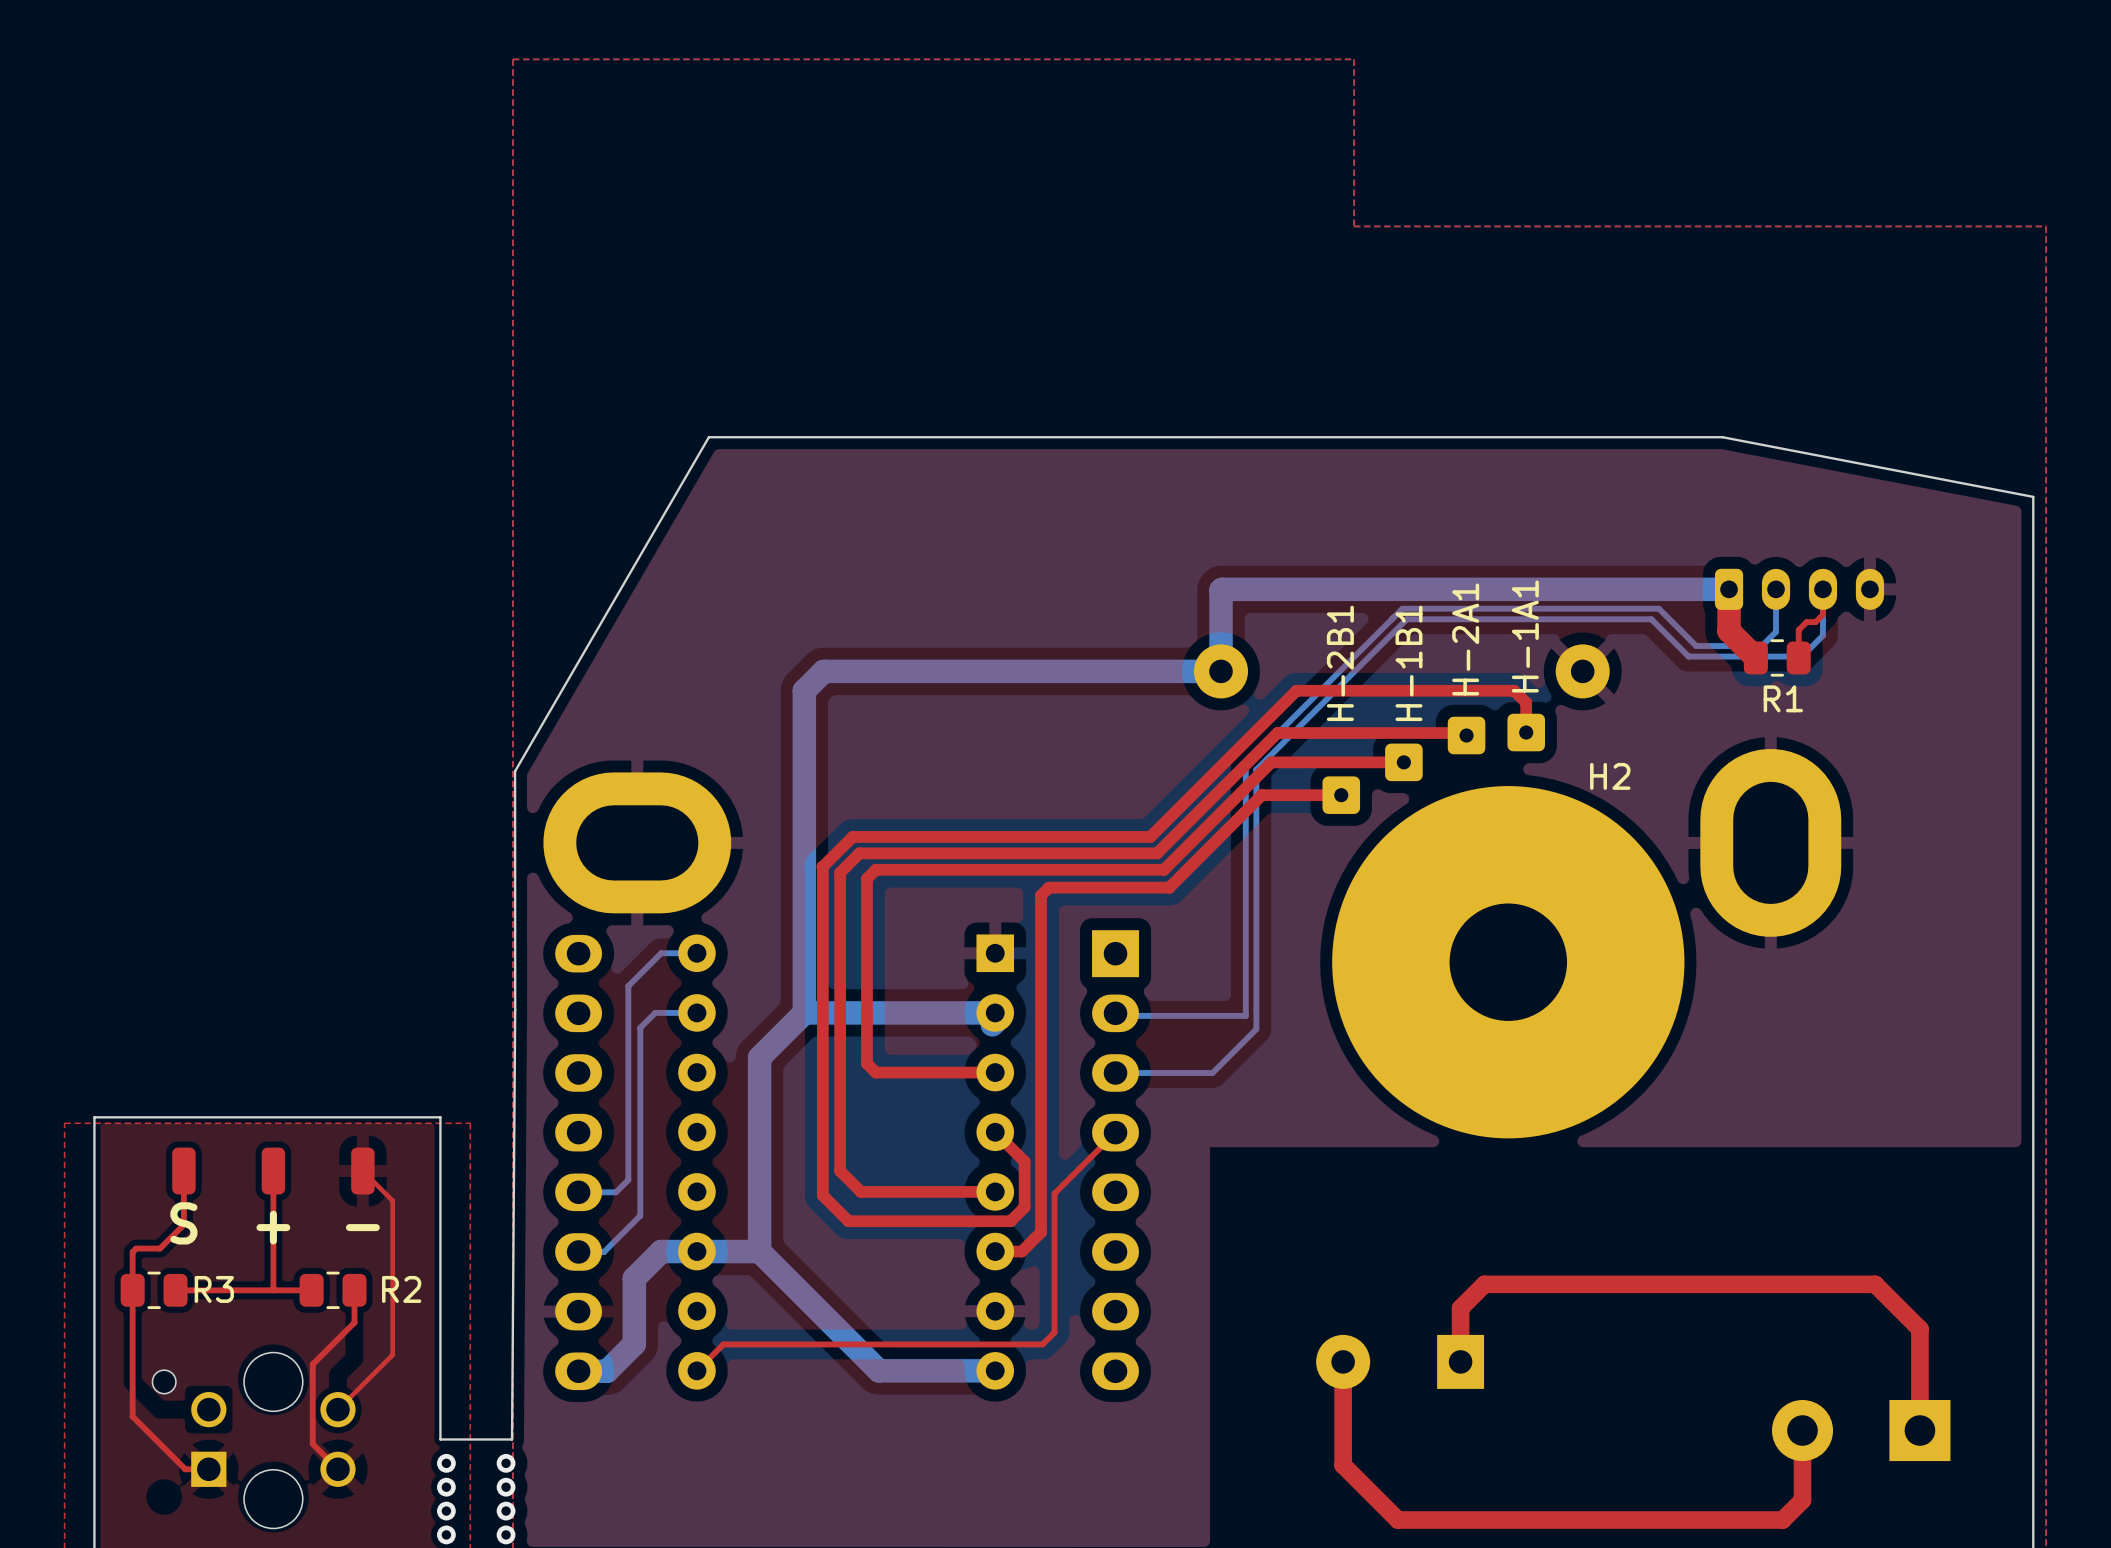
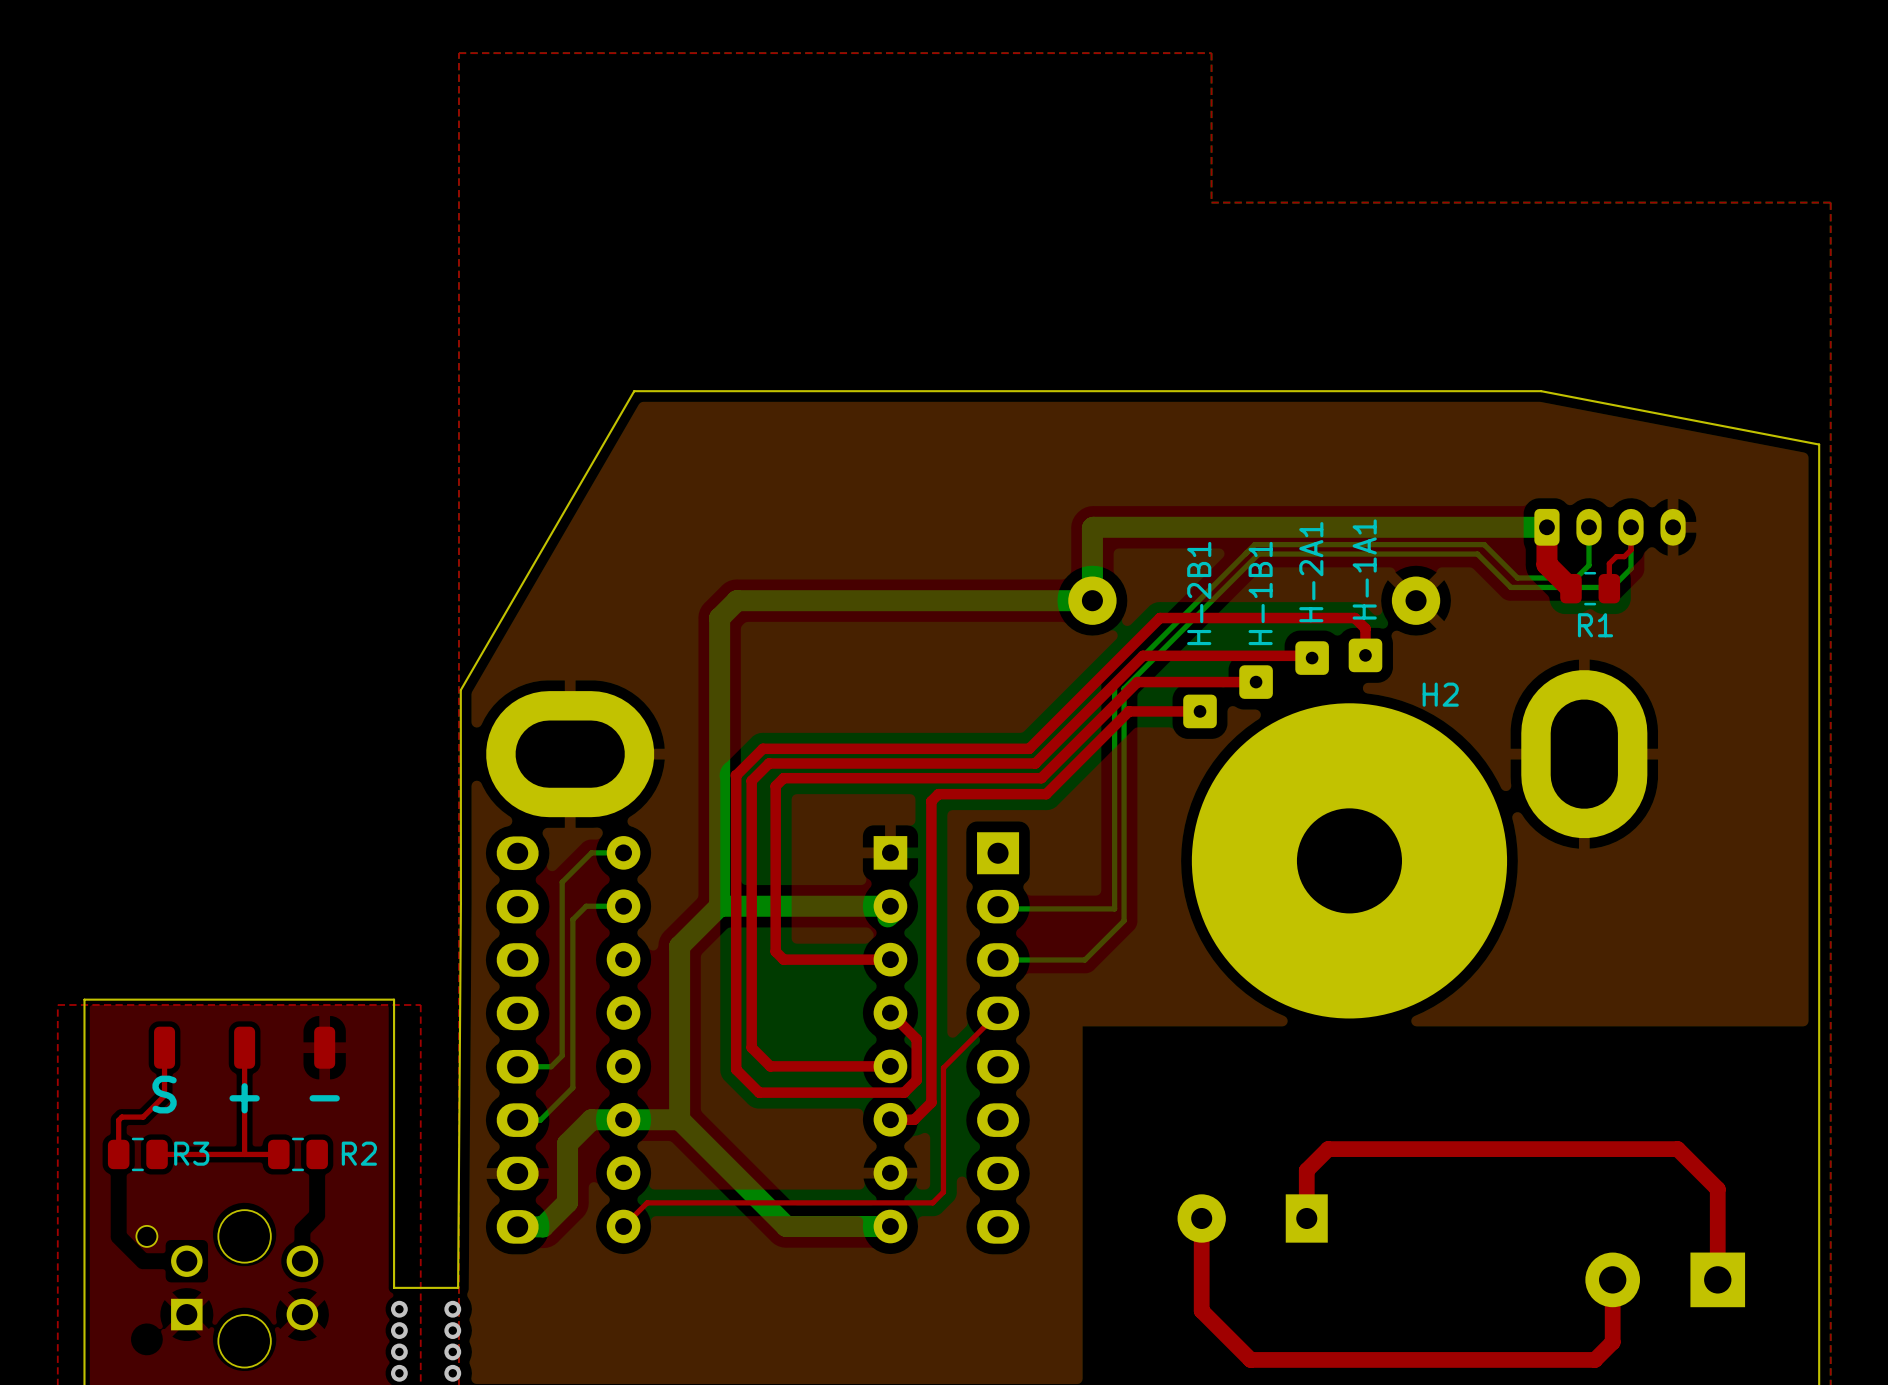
top track: (362, 1171) (392, 1200) (392, 1354) (337, 1409) -> none
top track: (132, 1290) (132, 1416) (185, 1469) (208, 1469) -> none
top track: (354, 1290) (354, 1322) (312, 1364) (312, 1444) (337, 1469) -> none

